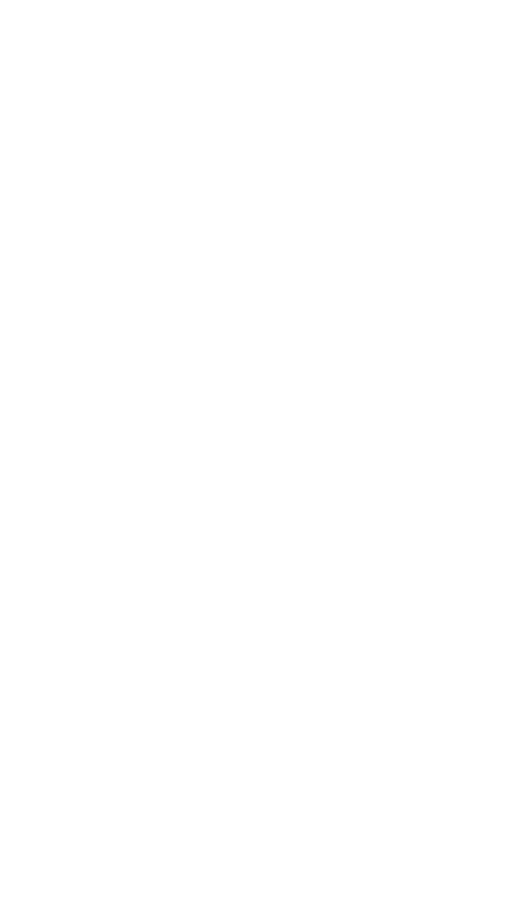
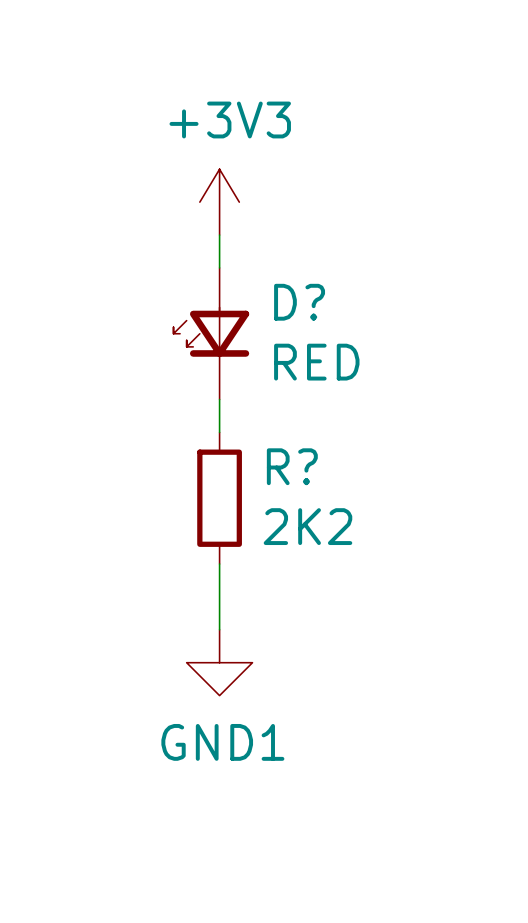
power symbol: none -> +3V3 (219, 202)
wire: none -> (219, 235) (219, 267)
D?: none -> RED (211, 333)
wire: none -> (219, 399) (219, 432)
R?: none -> 2K2 (219, 498)
wire: none -> (219, 564) (219, 629)
power symbol: none -> GND1 (219, 662)

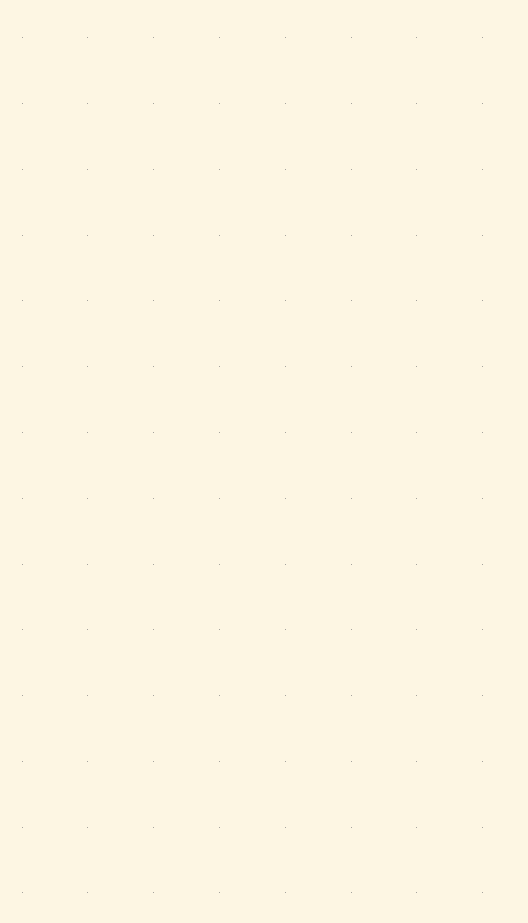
power symbol: +3V3 (219, 202) -> none
wire: (219, 235) (219, 267) -> none
D?: RED (211, 333) -> none
wire: (219, 399) (219, 432) -> none
R?: 2K2 (219, 498) -> none
wire: (219, 564) (219, 629) -> none
power symbol: GND1 (219, 662) -> none

